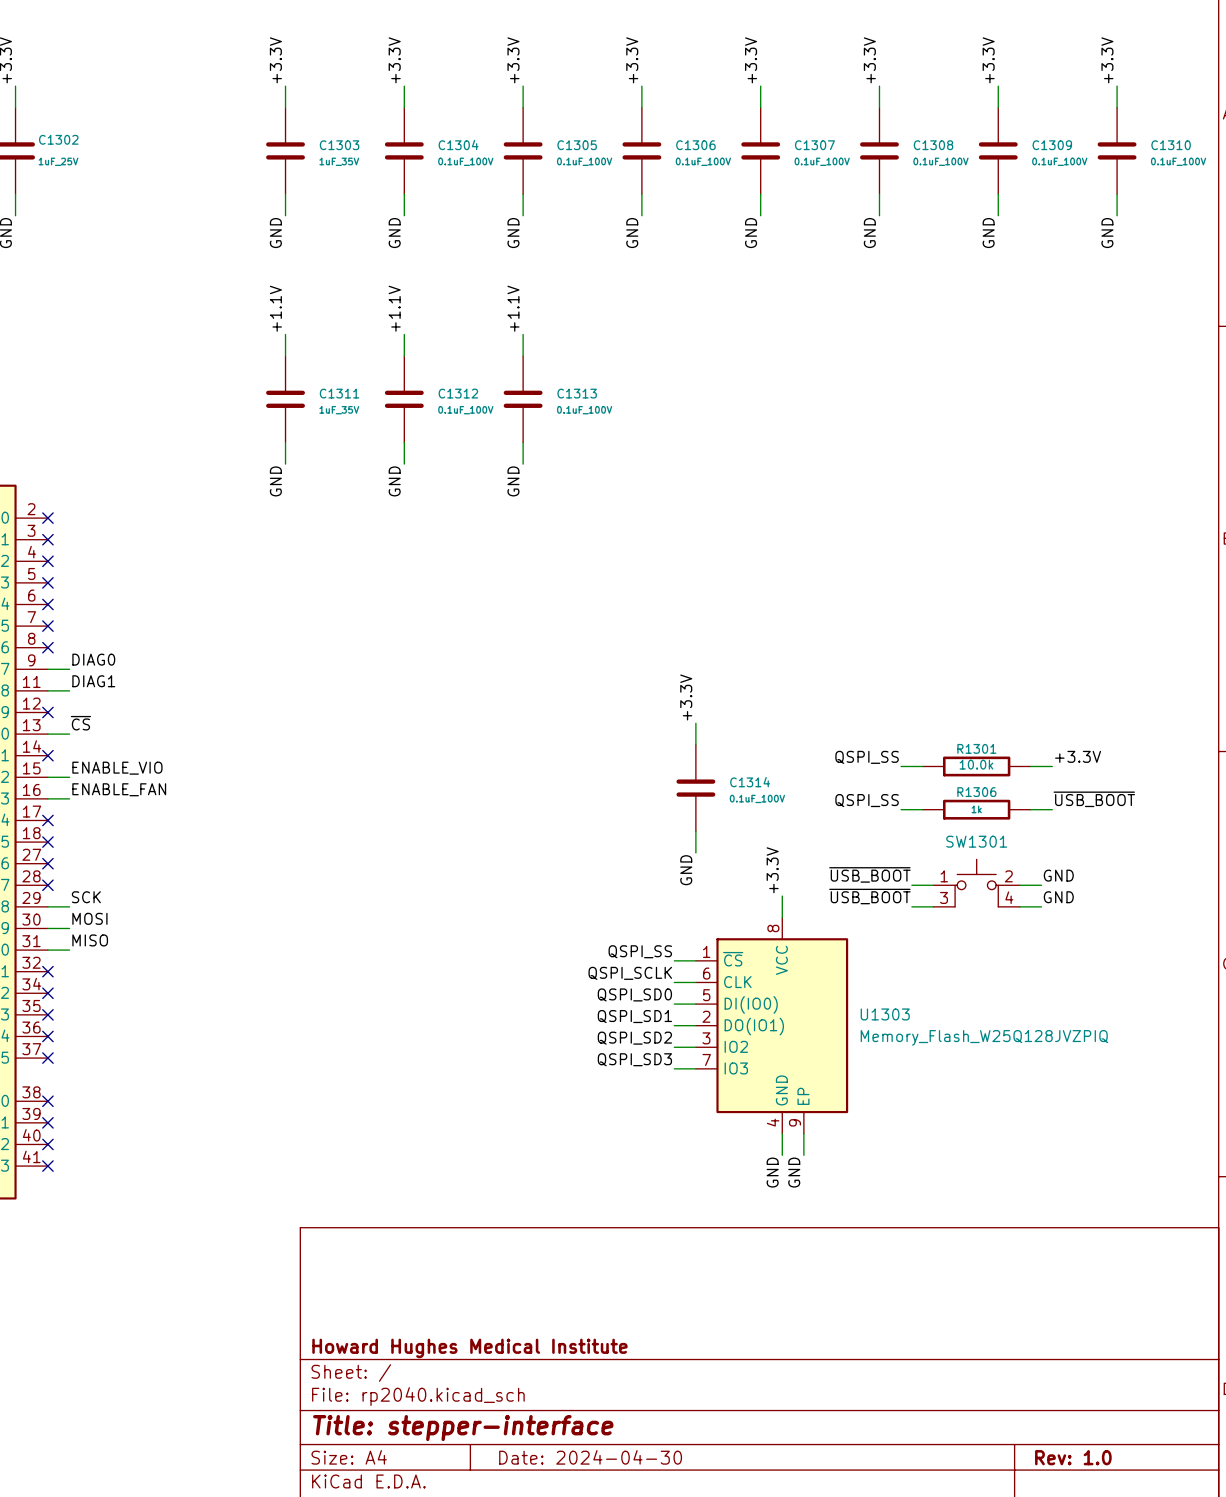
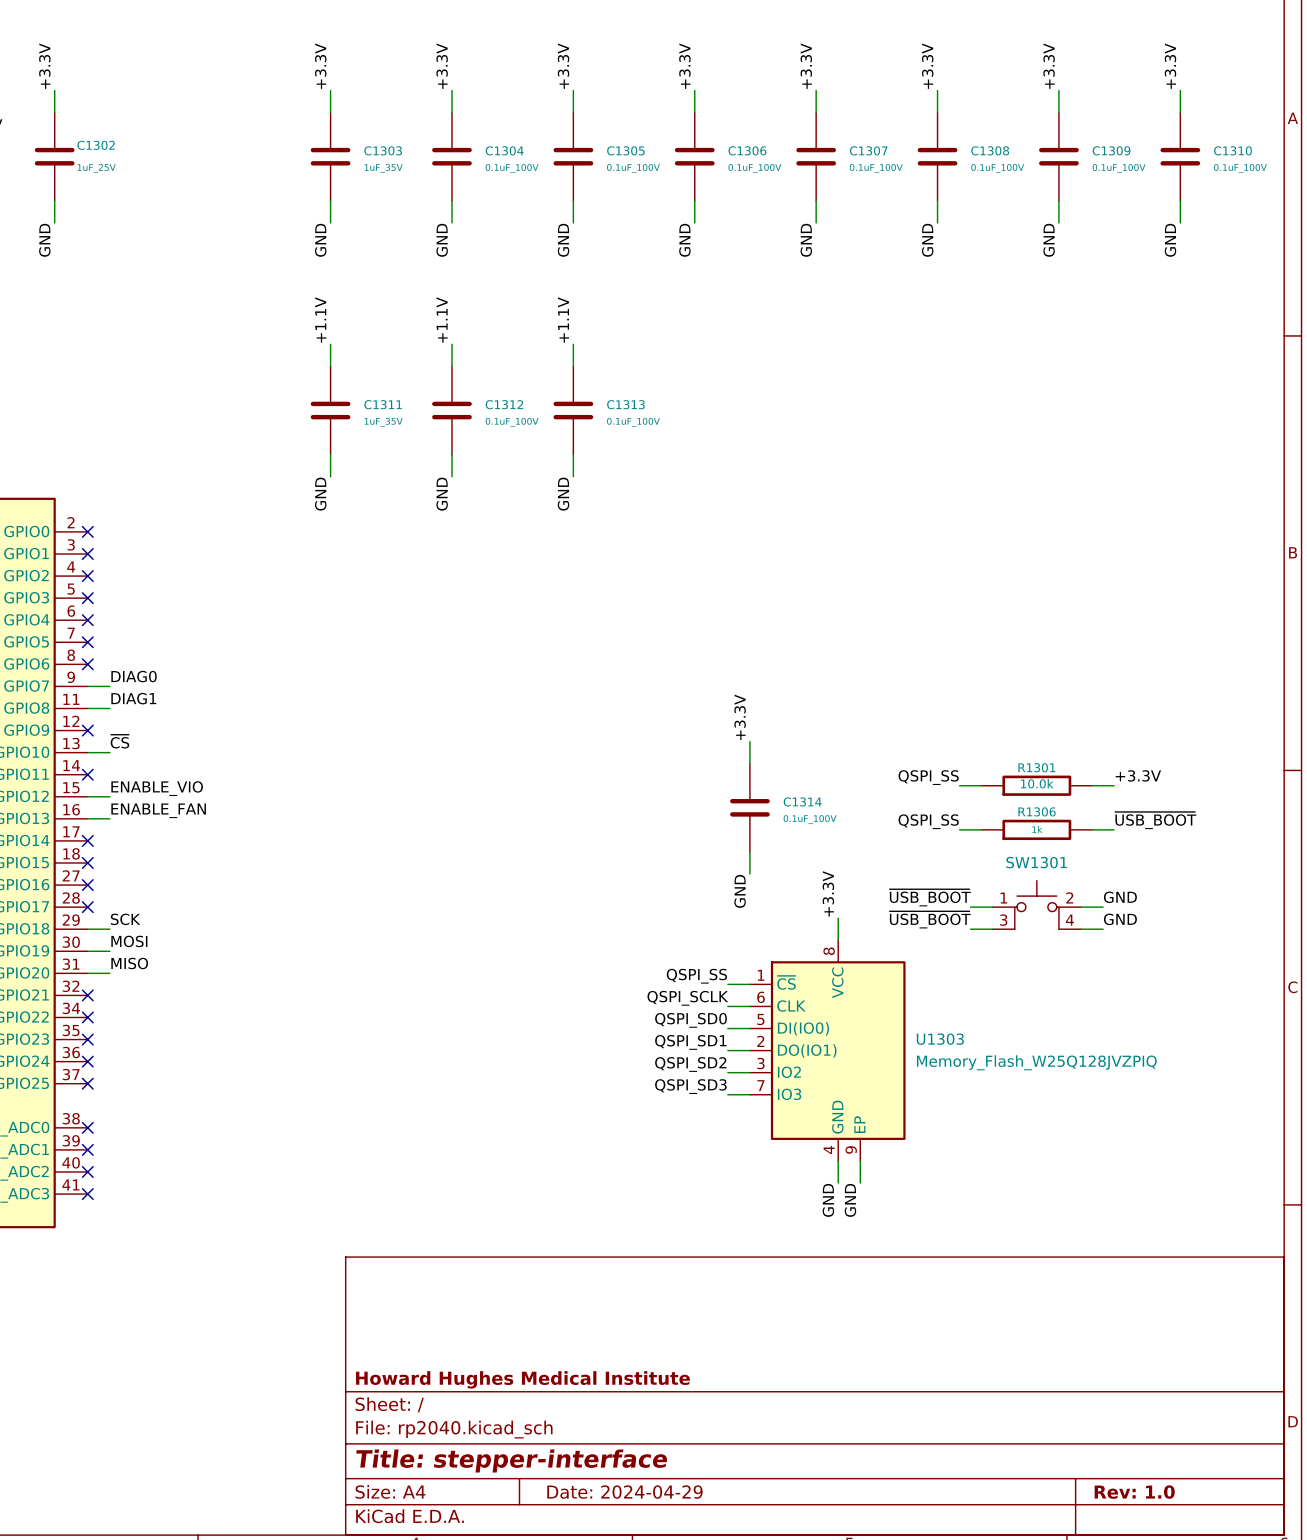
title block: Date: 2024-04-30 (590, 1457) -> Date: 2024-04-29 (624, 1492)

